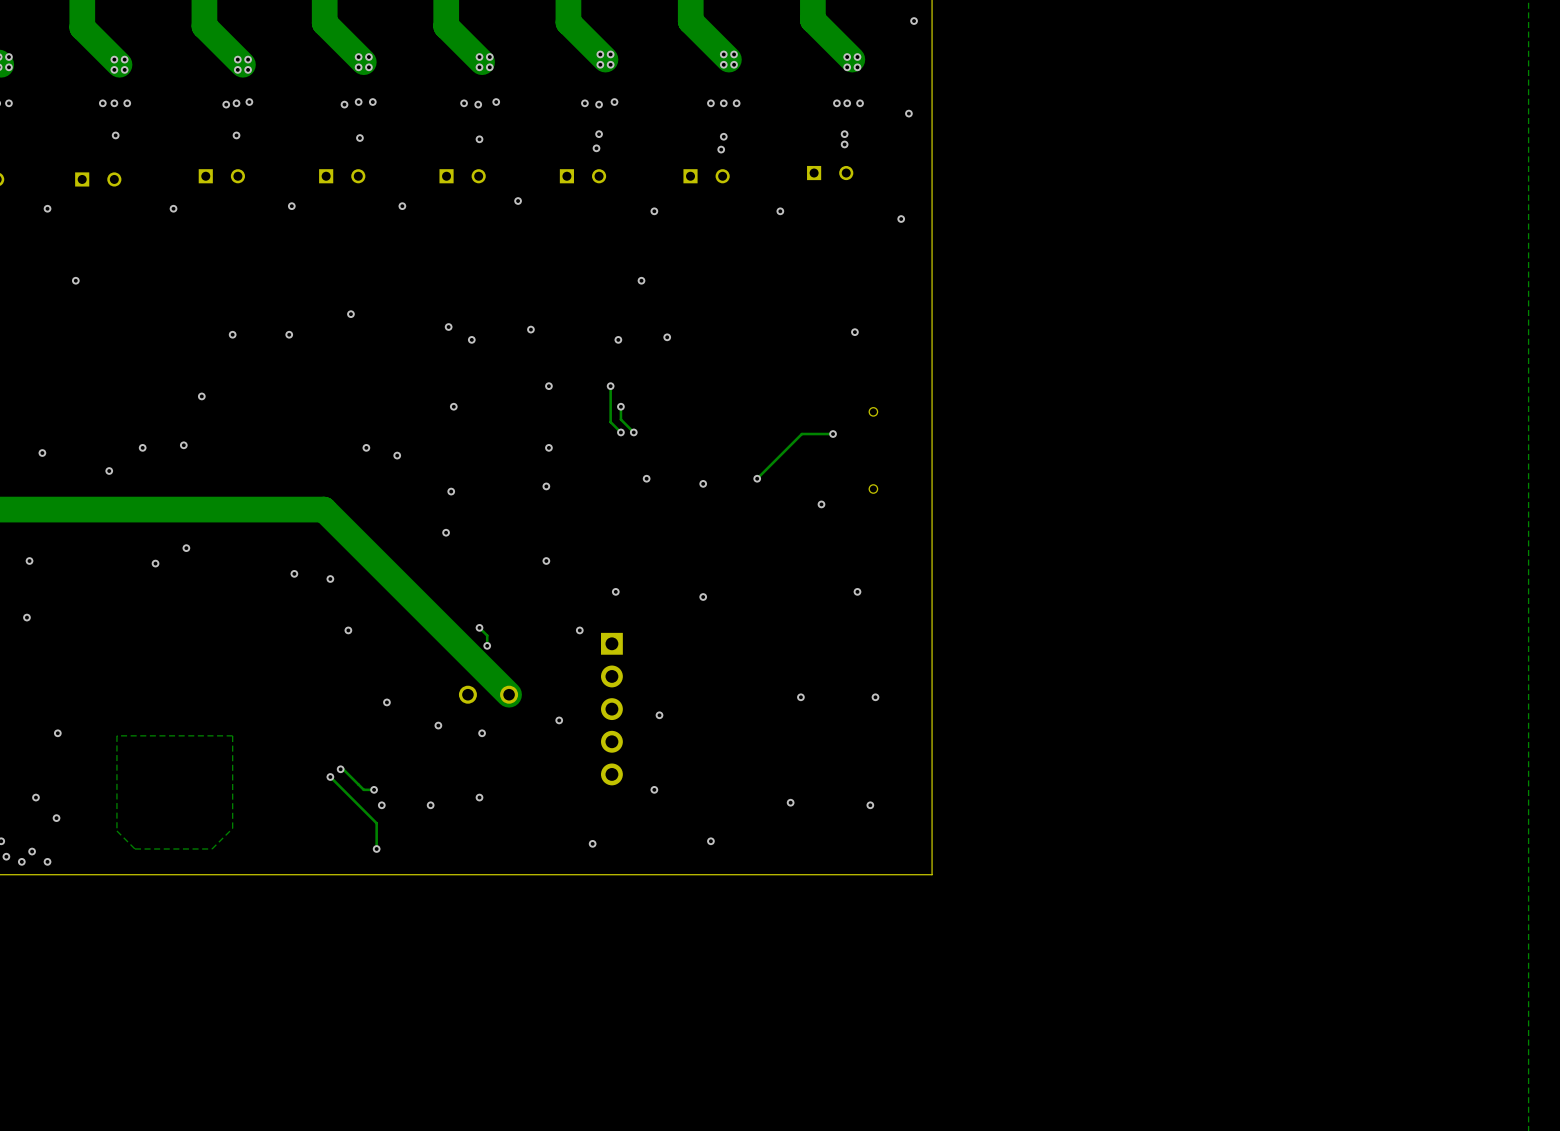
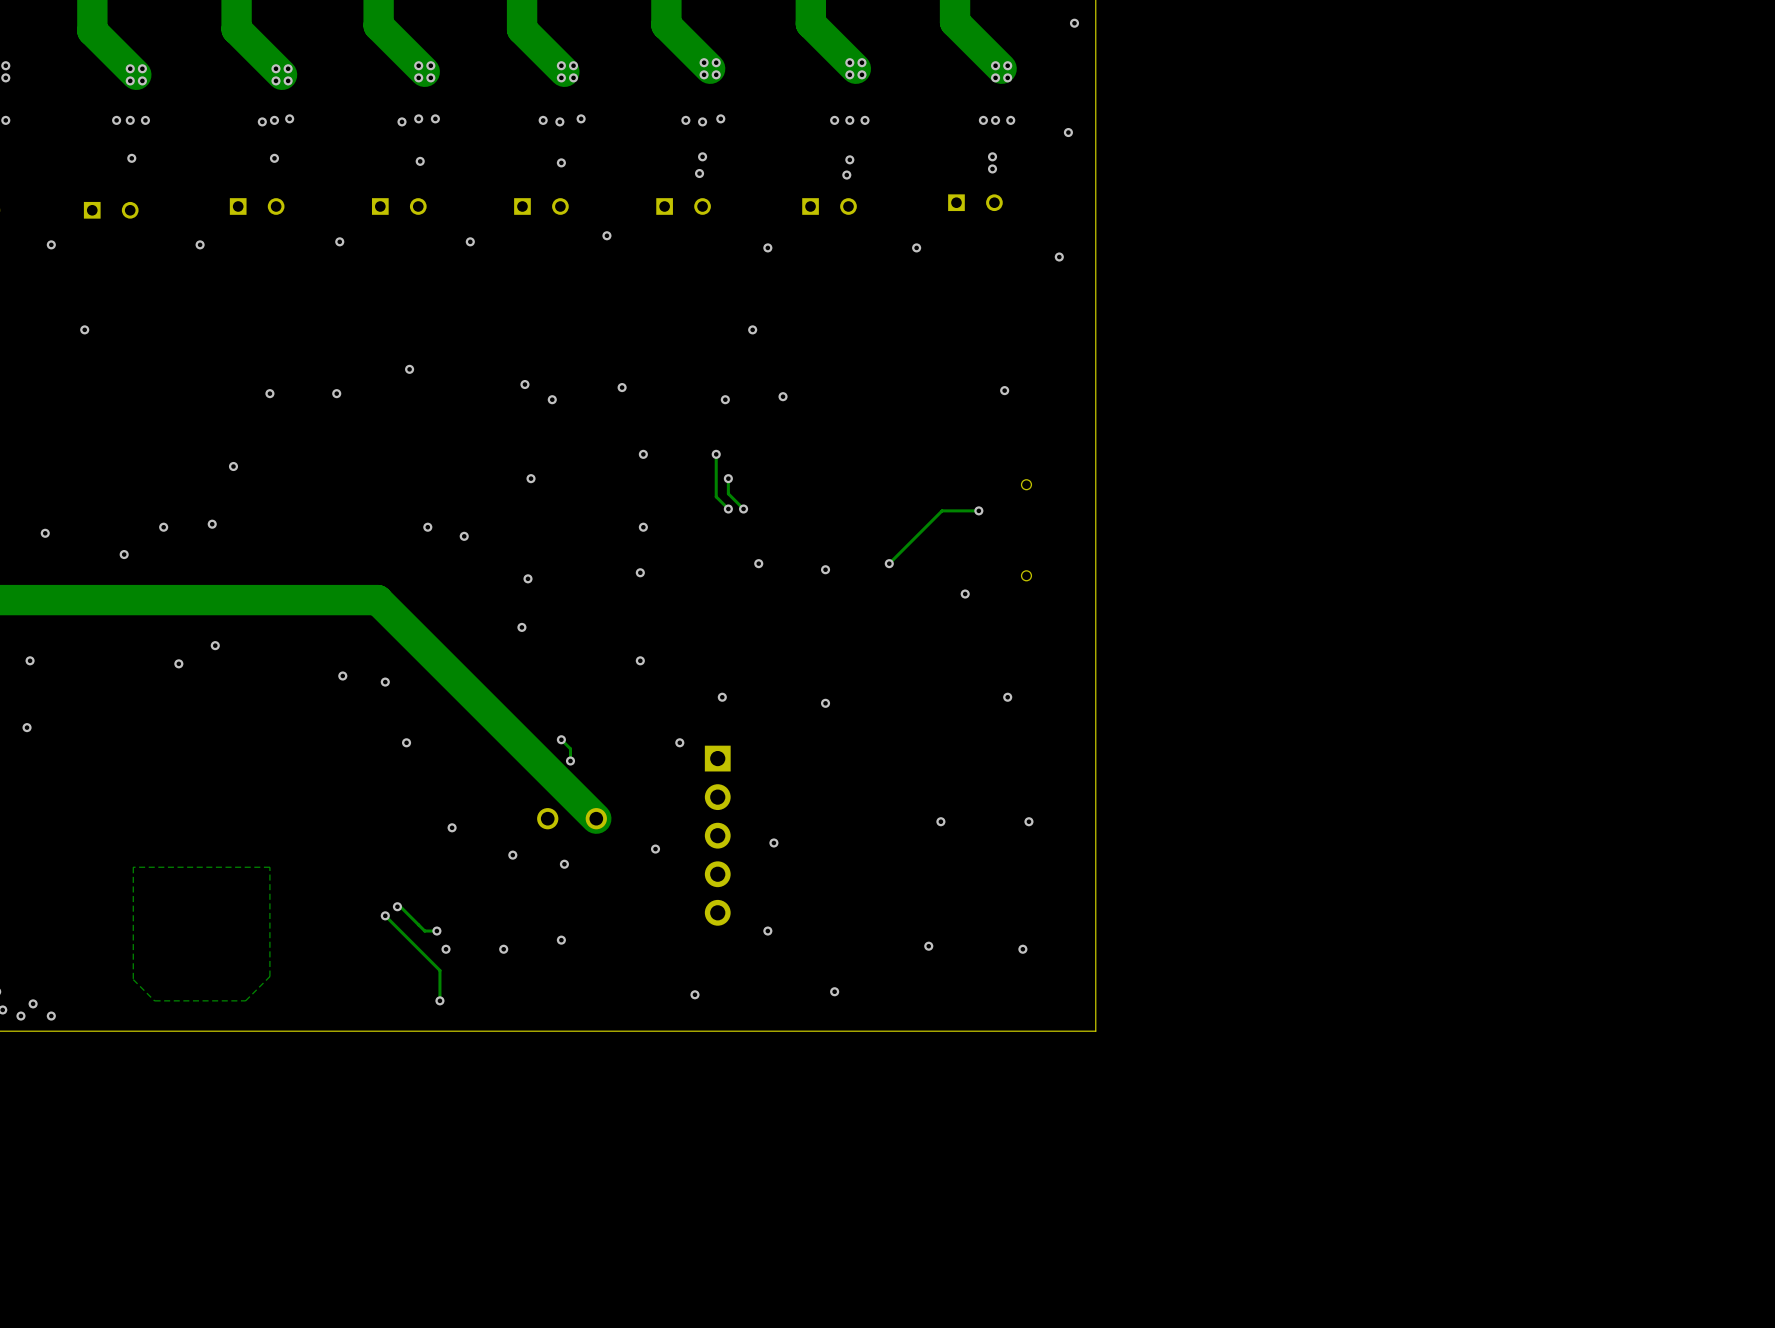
via: (57, 733) -> none
via: (35, 797) -> none
via: (56, 818) -> none

